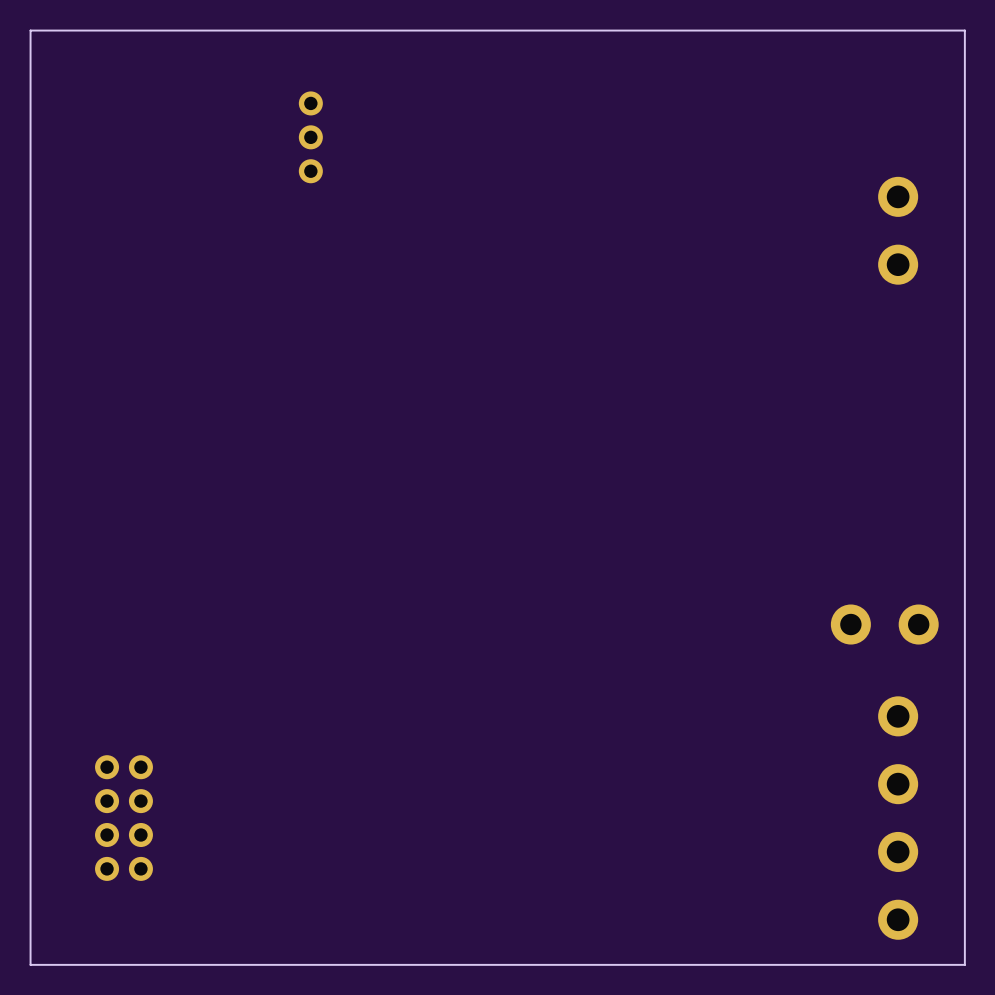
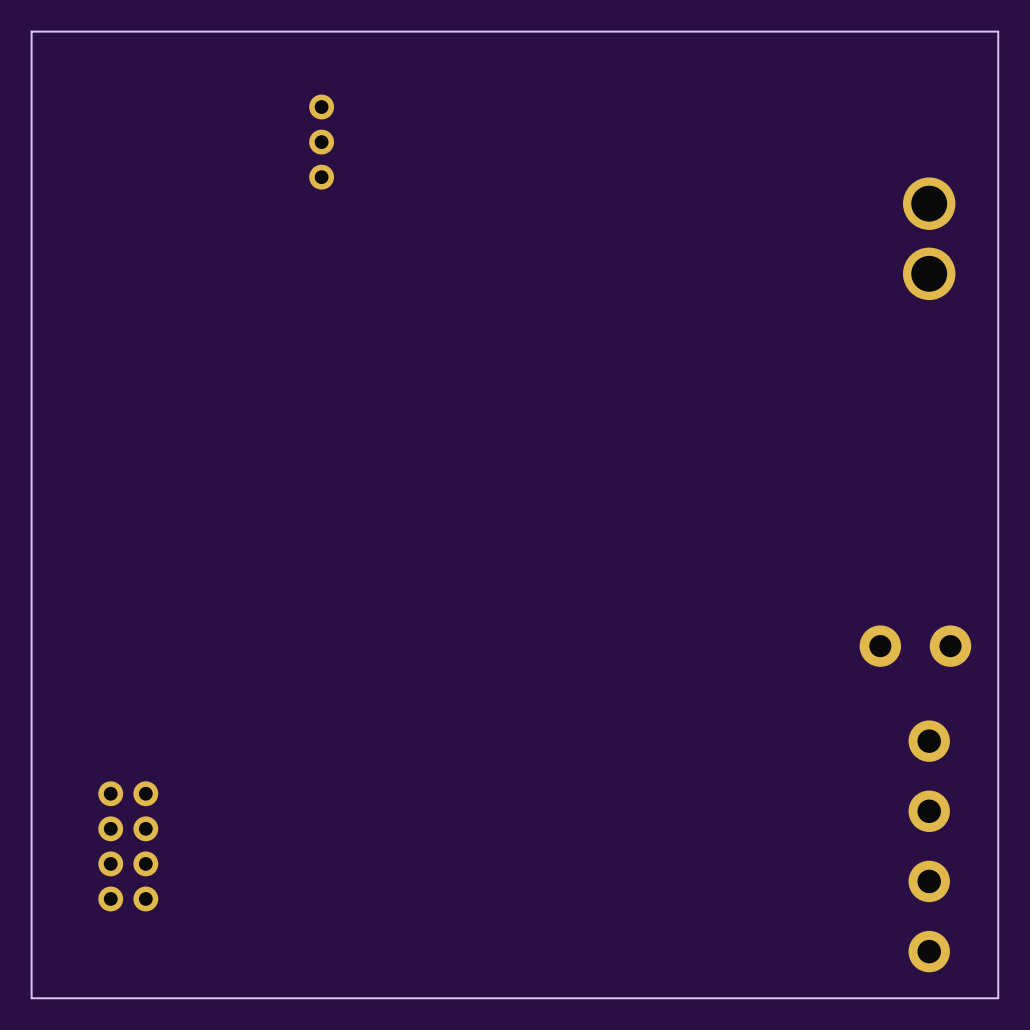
part footprint: [878, 176, 919, 285] -> [902, 177, 956, 301]

